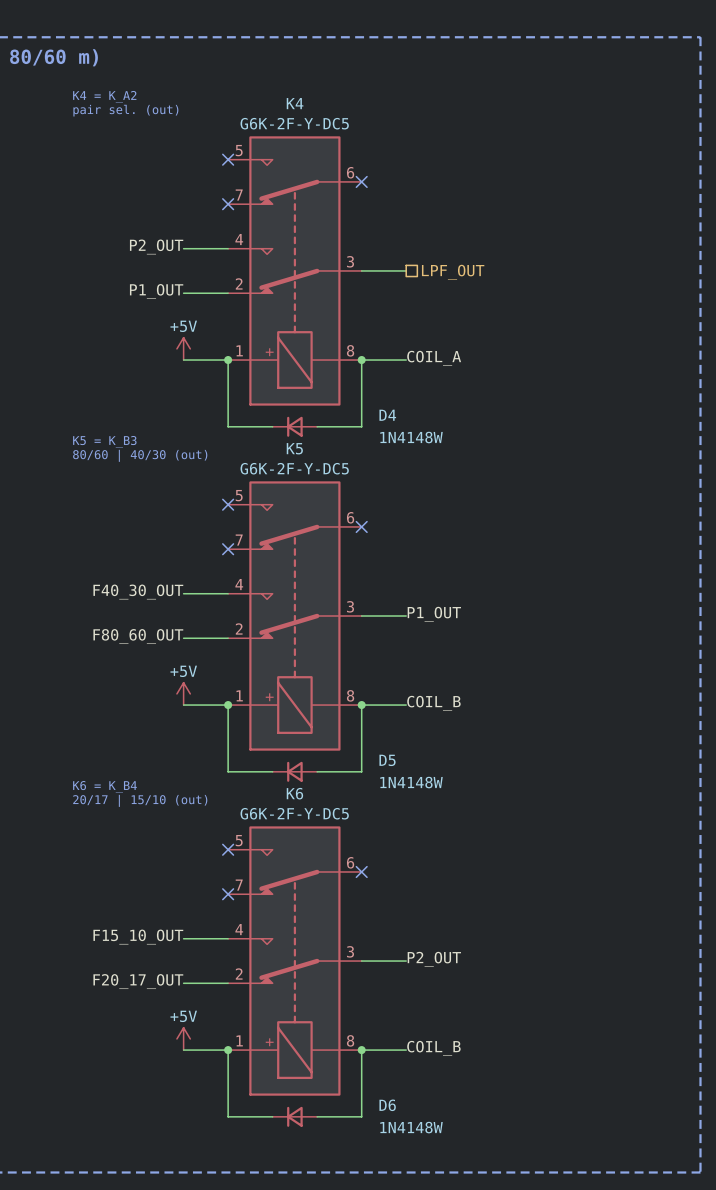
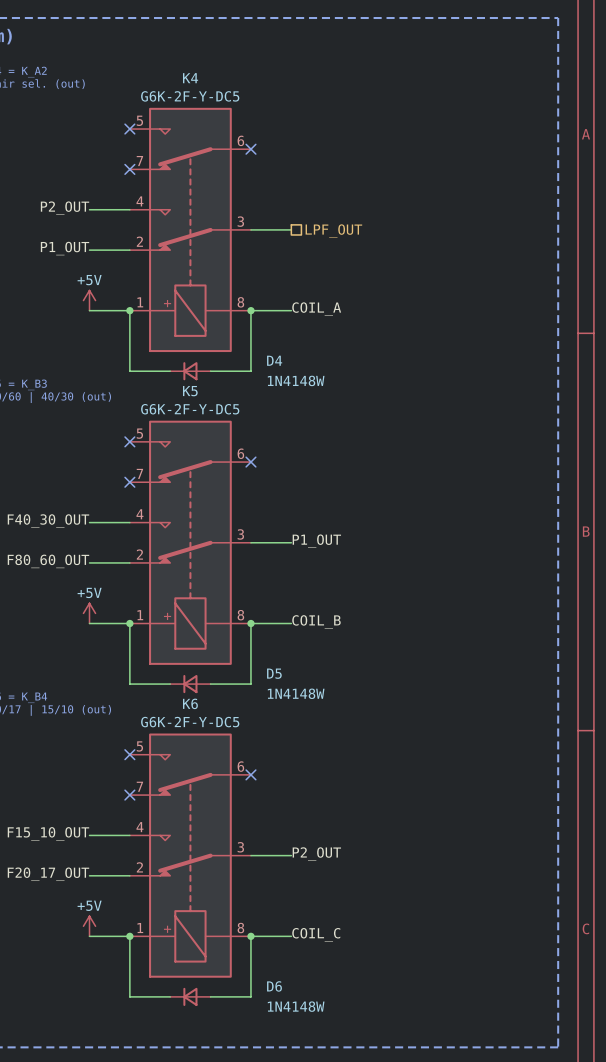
label: COIL_B (433, 1048) -> COIL_C (316, 934)

